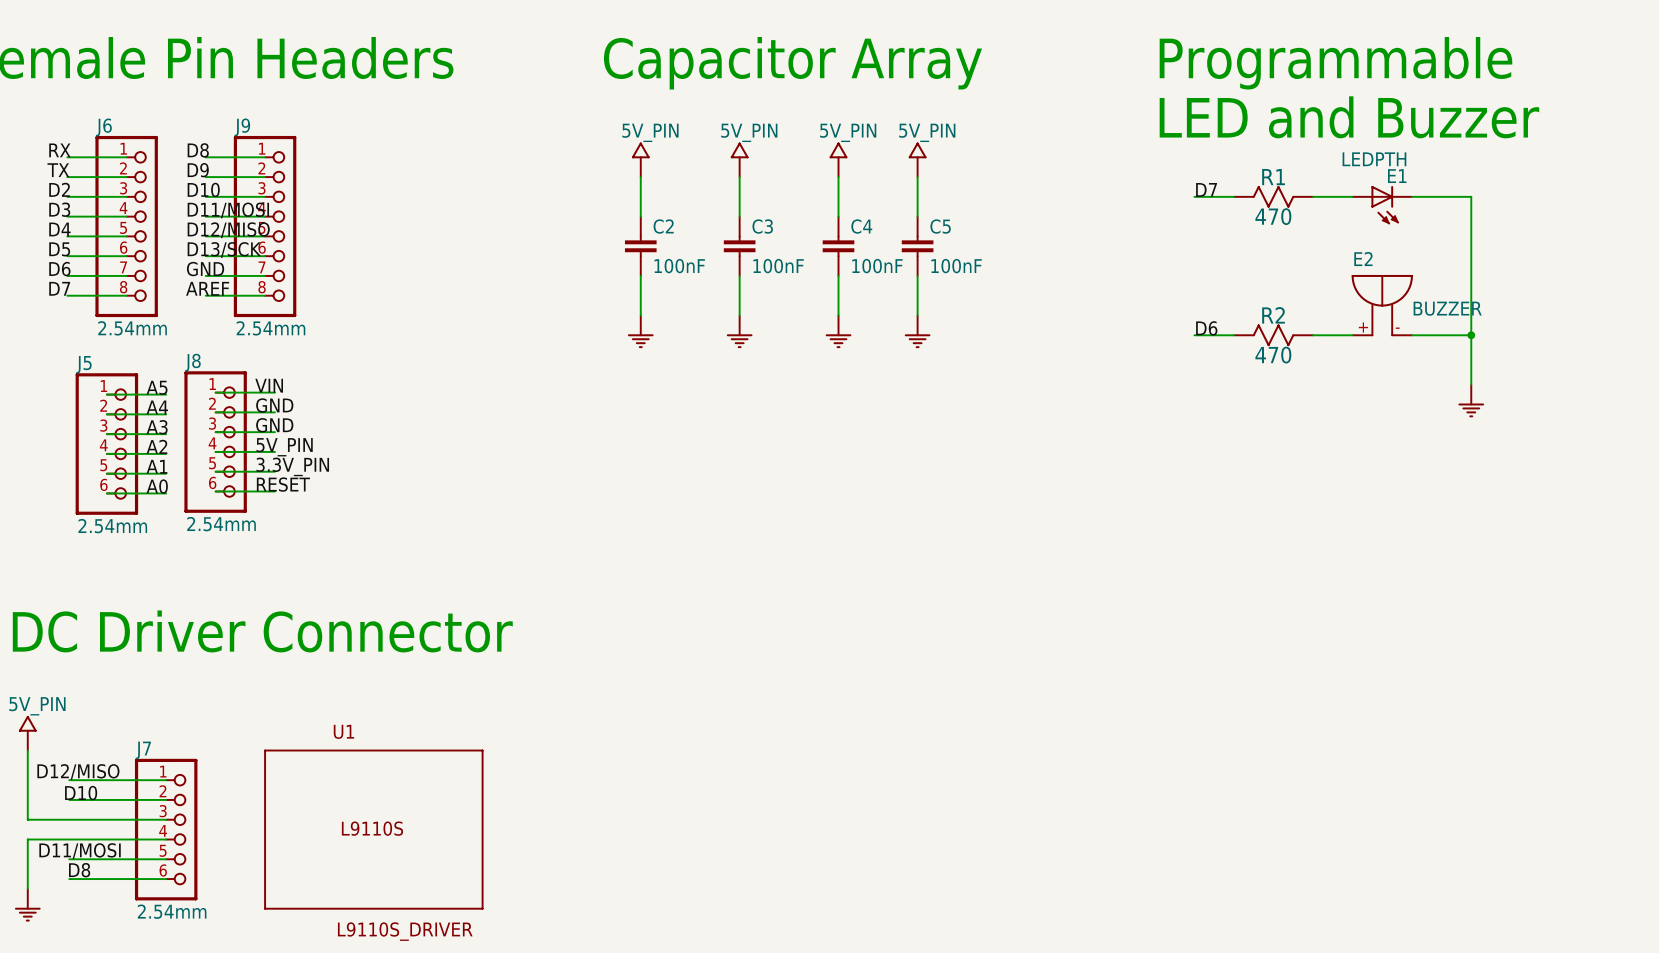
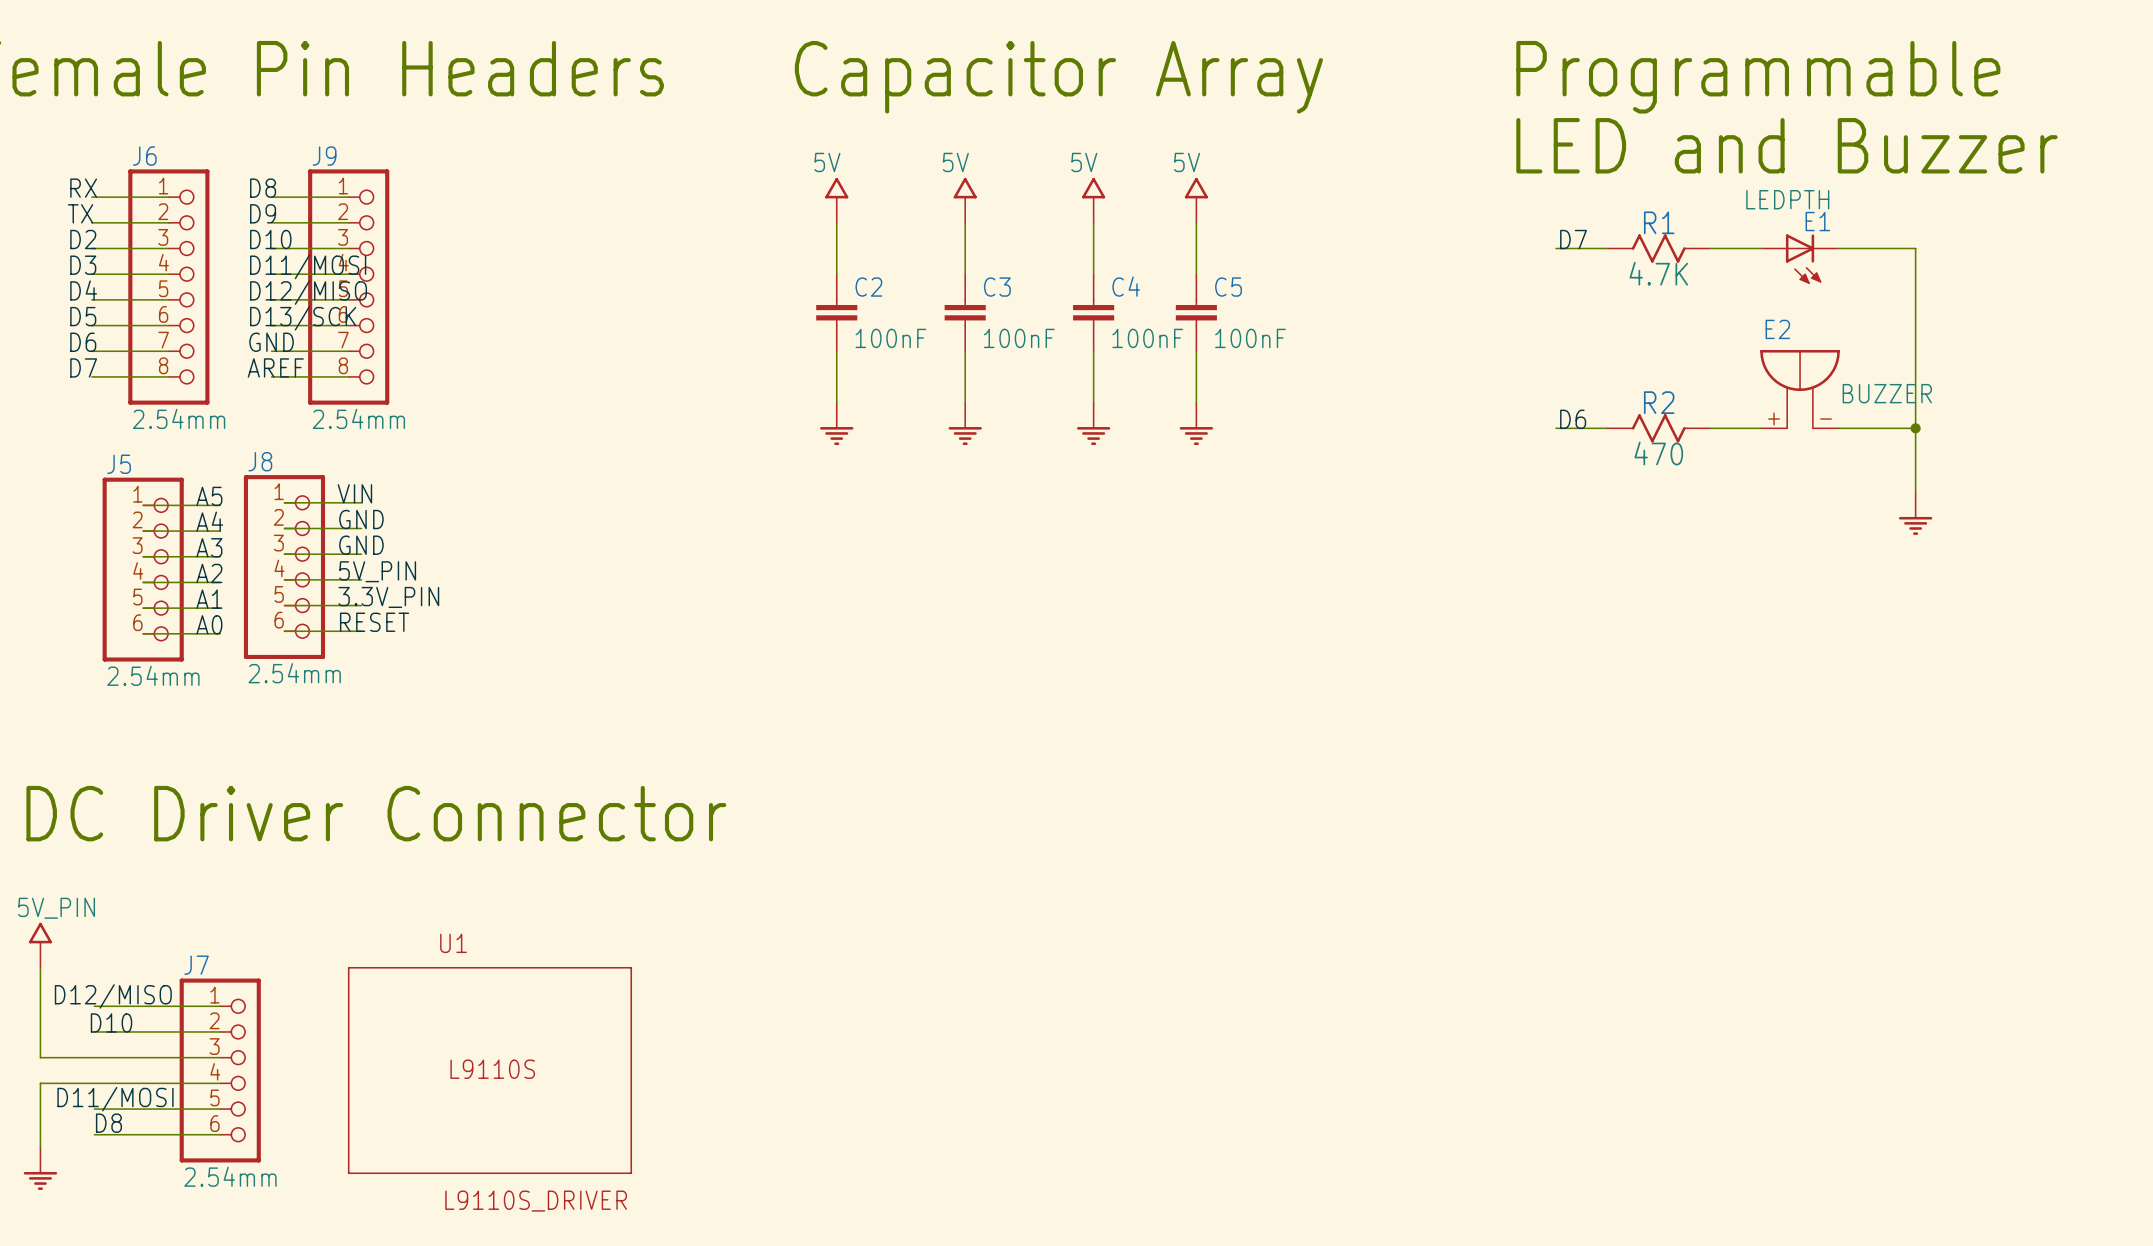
power symbol: 5V_PIN (640, 159) -> 5V (836, 200)
power symbol: 5V_PIN (739, 159) -> 5V (965, 200)
power symbol: 5V_PIN (838, 159) -> 5V (1093, 200)
power symbol: 5V_PIN (917, 159) -> 5V (1196, 200)
R1 value: 470 (1273, 216) -> 4.7K (1658, 273)

